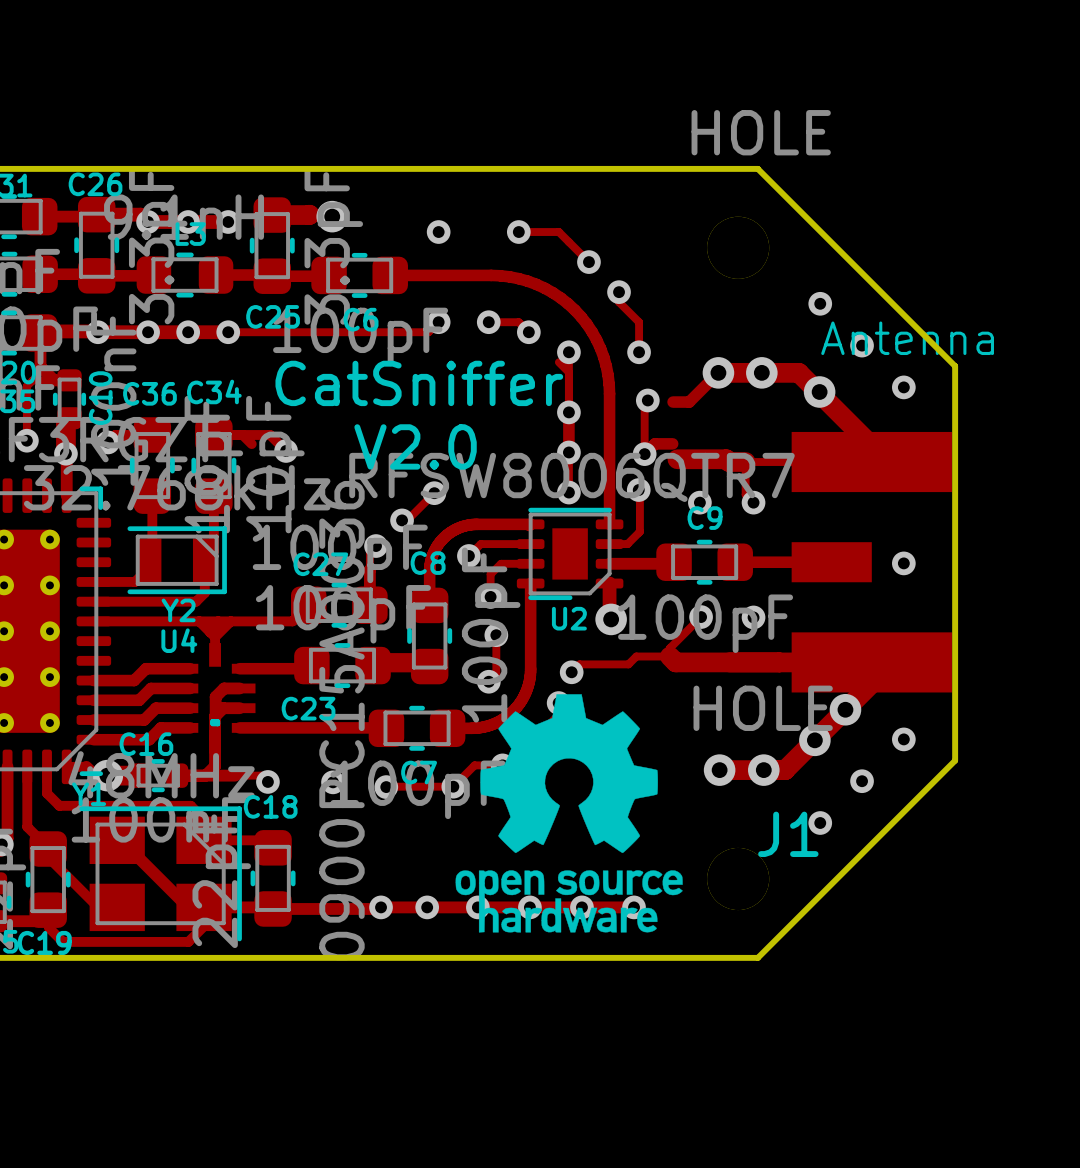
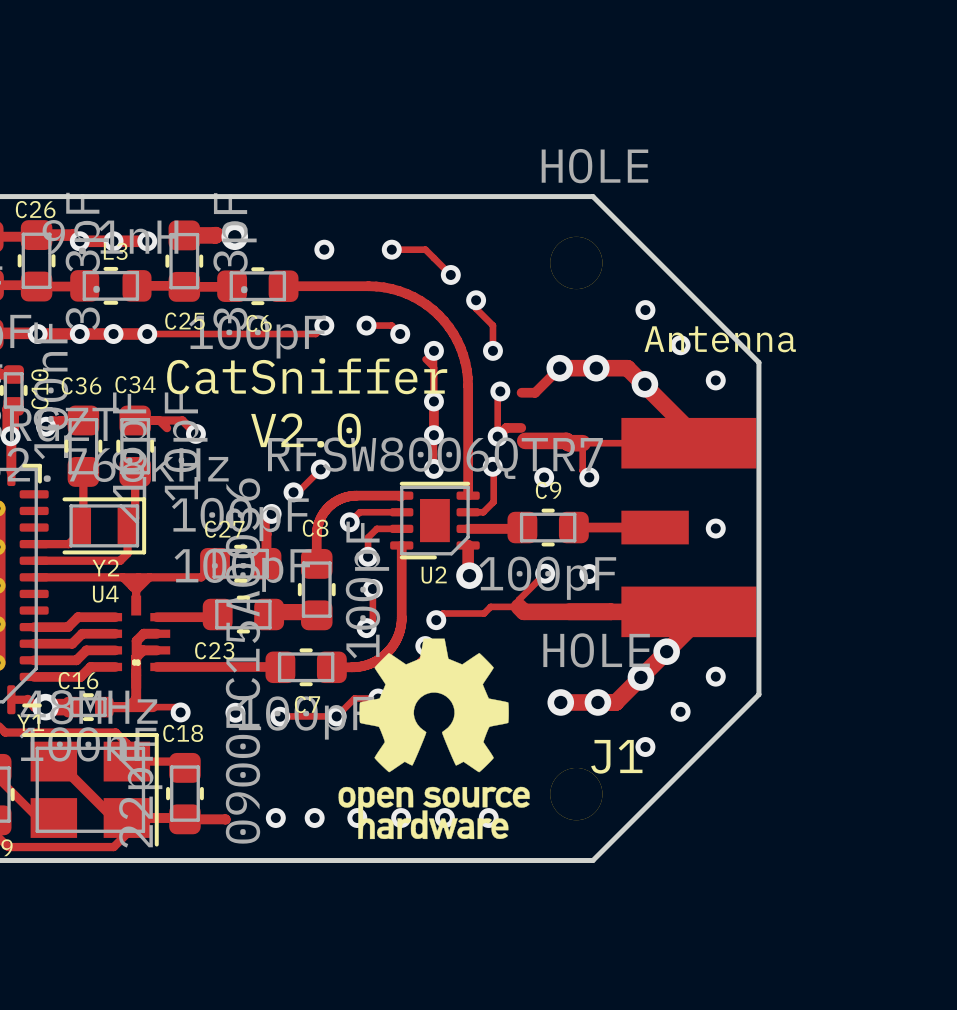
track: (634, 907) (321, 908) -> none

